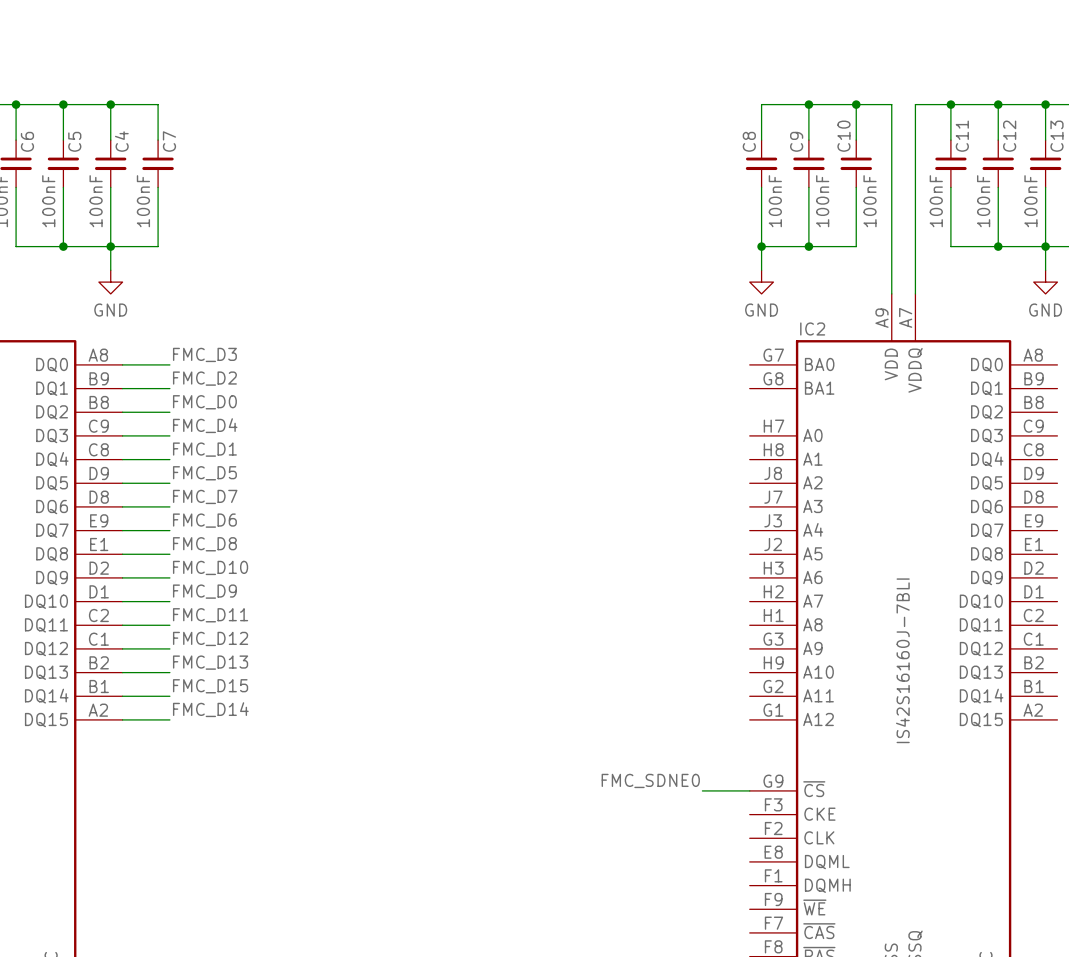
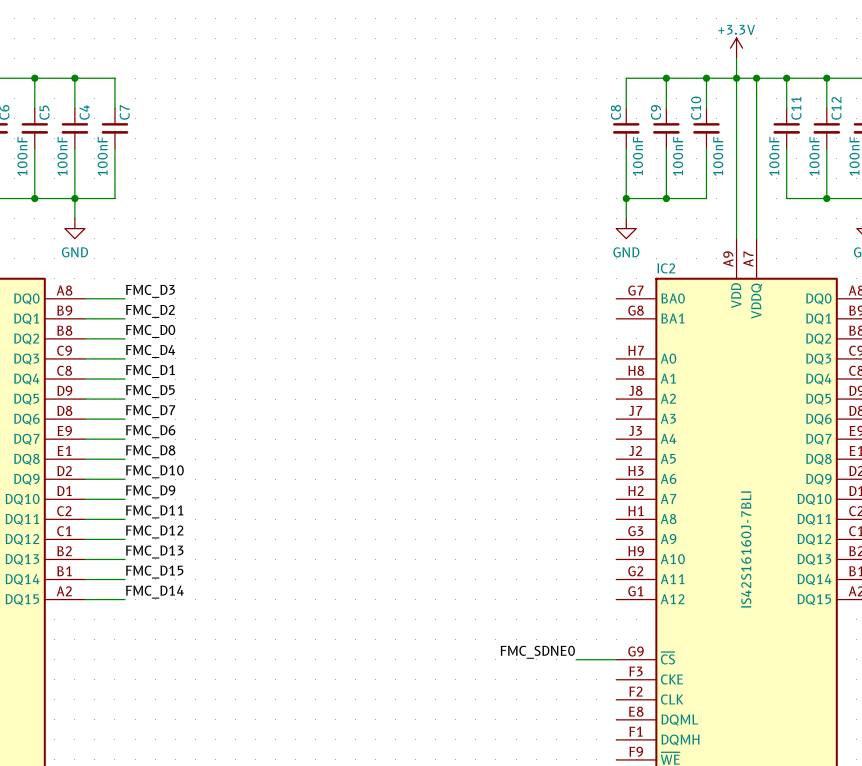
power symbol: none -> +3.3V (736, 48)
wire: none -> (736, 58) (736, 78) (756, 78)
junction: none -> (736, 78)
junction: none -> (756, 78)

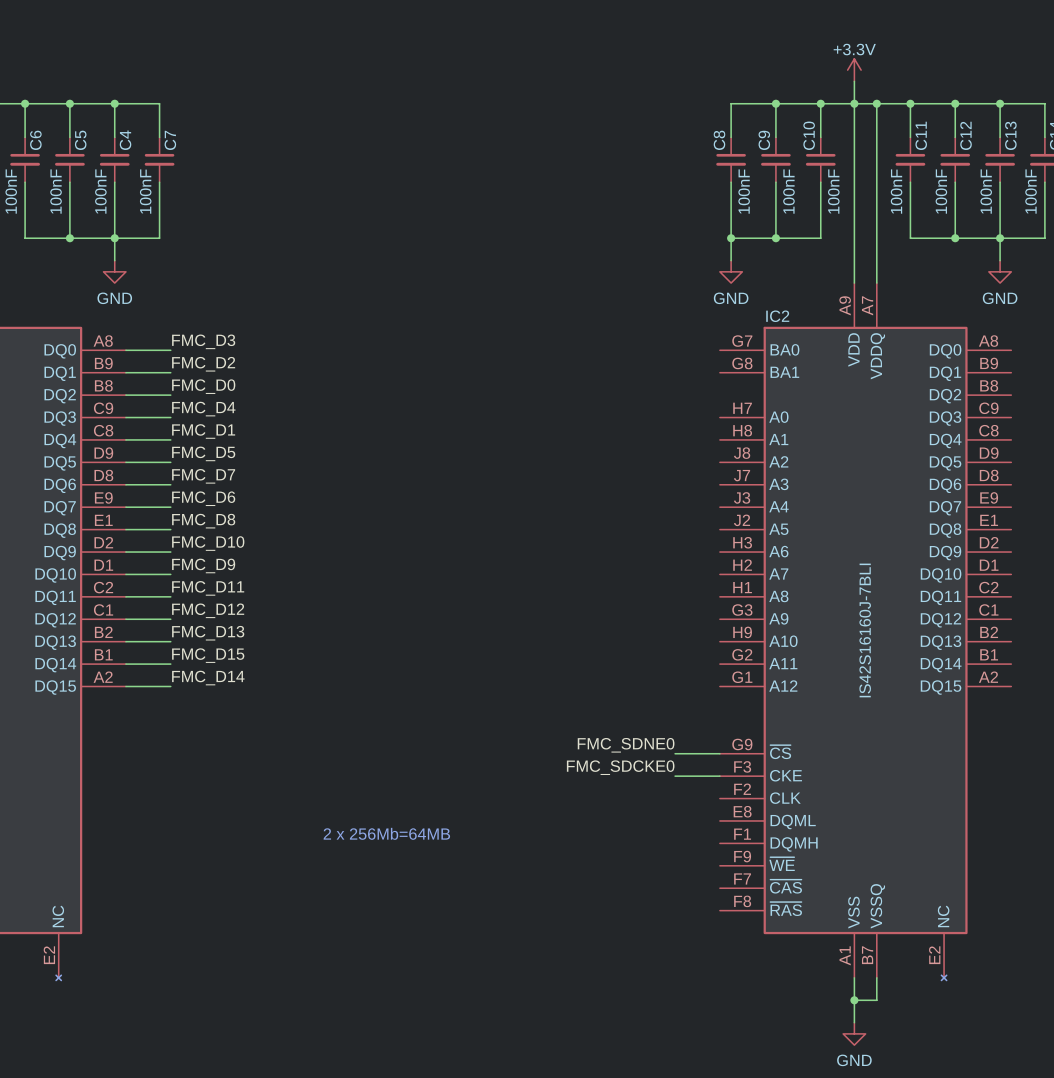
label: none -> FMC_SDCKE0 (620, 767)
wire: none -> (675, 776) (719, 776)
text: none -> 2 x 256Mb=64MB (386, 833)

